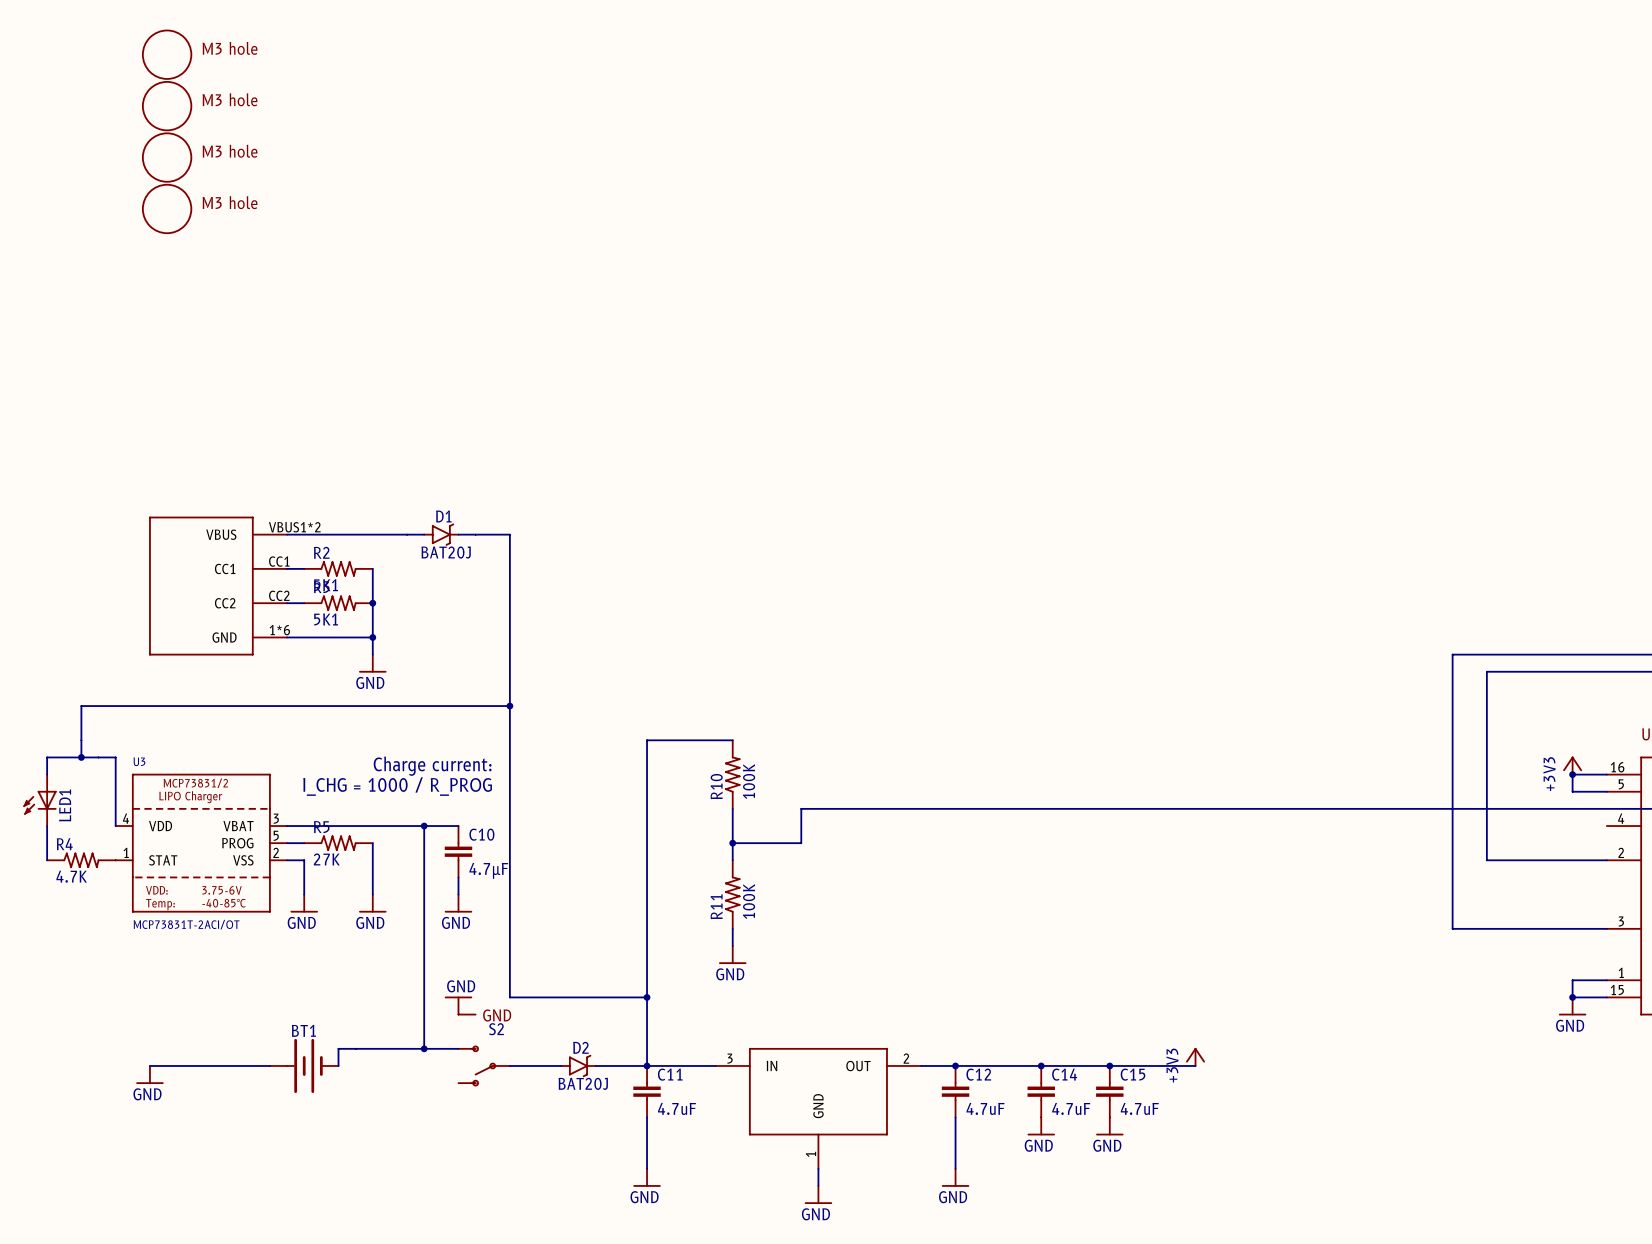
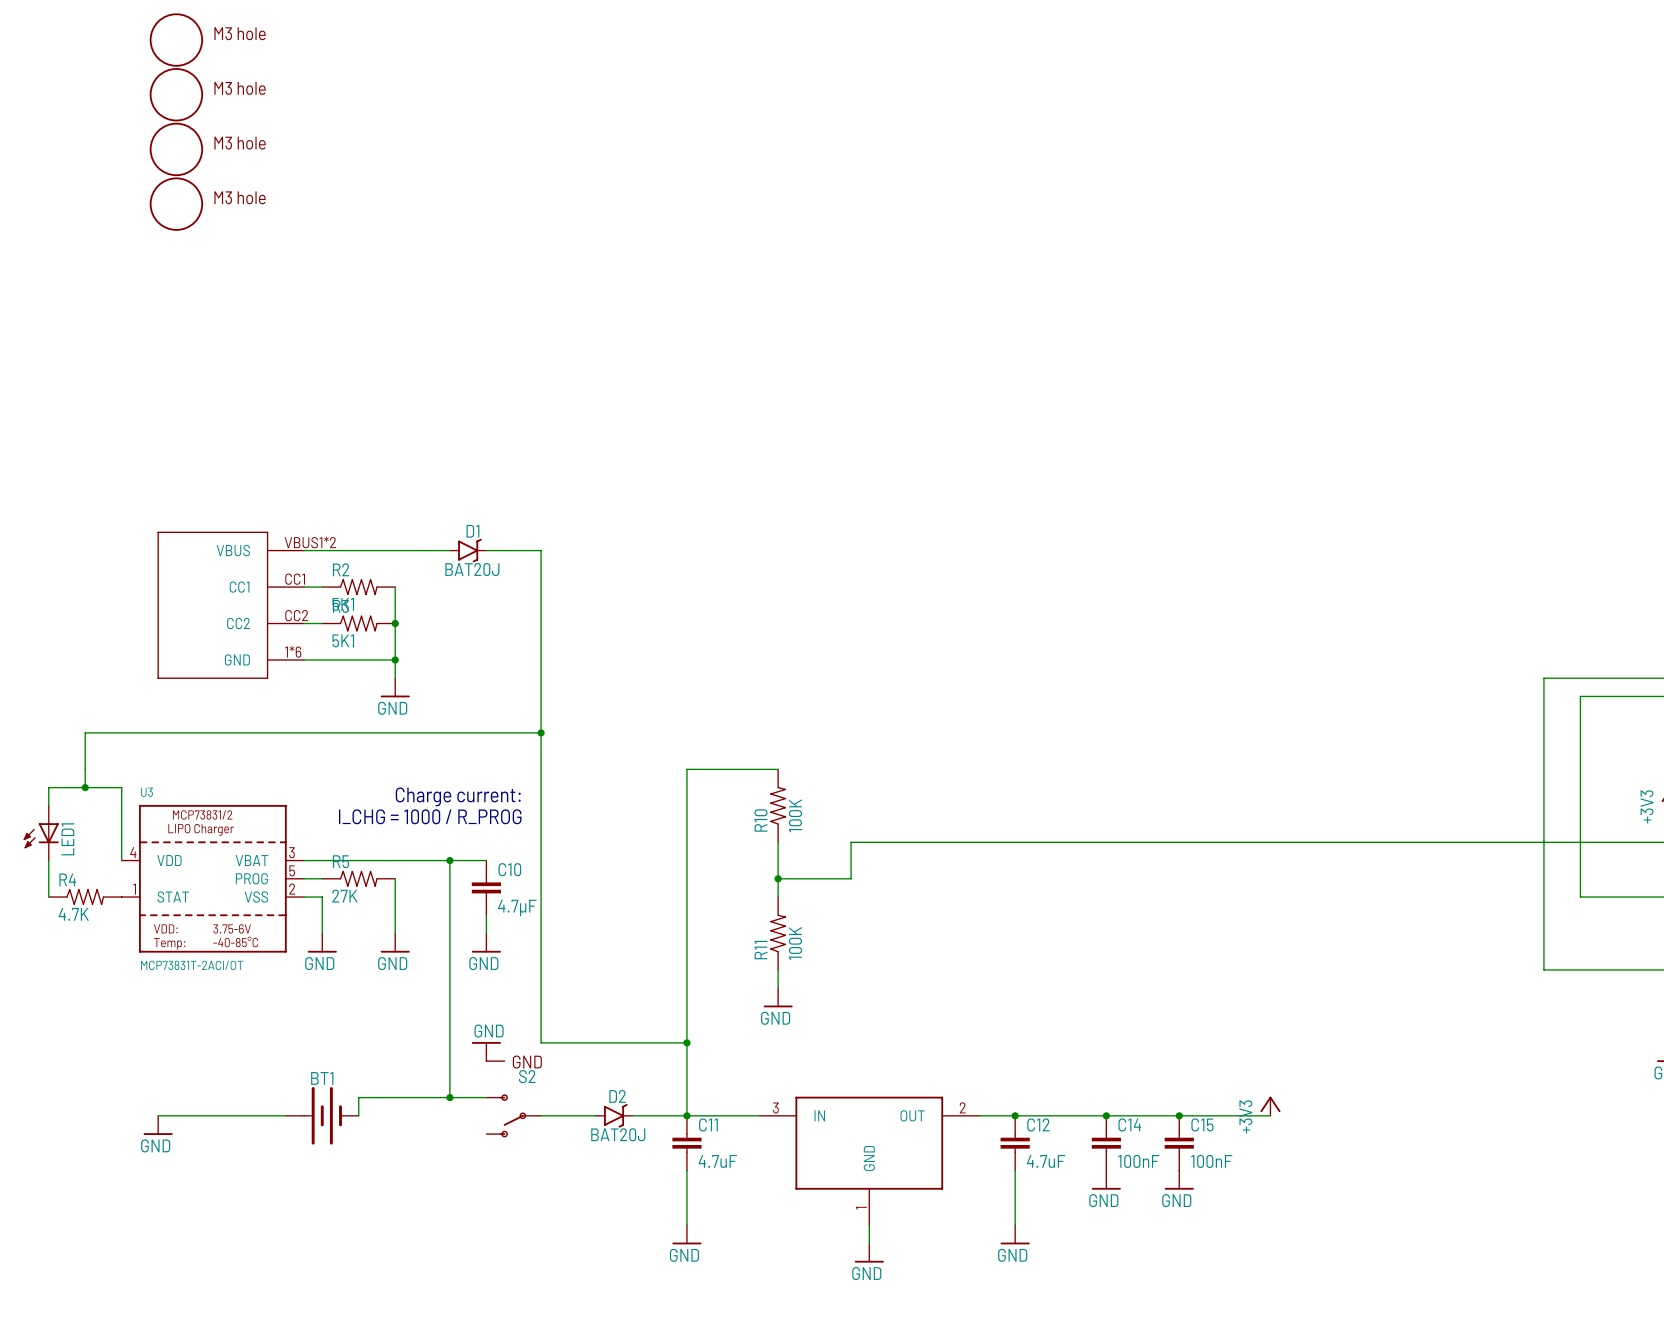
C14 value: 4.7uF (1071, 1108) -> 100nF (1138, 1161)
C15 value: 4.7uF (1139, 1108) -> 100nF (1211, 1161)

